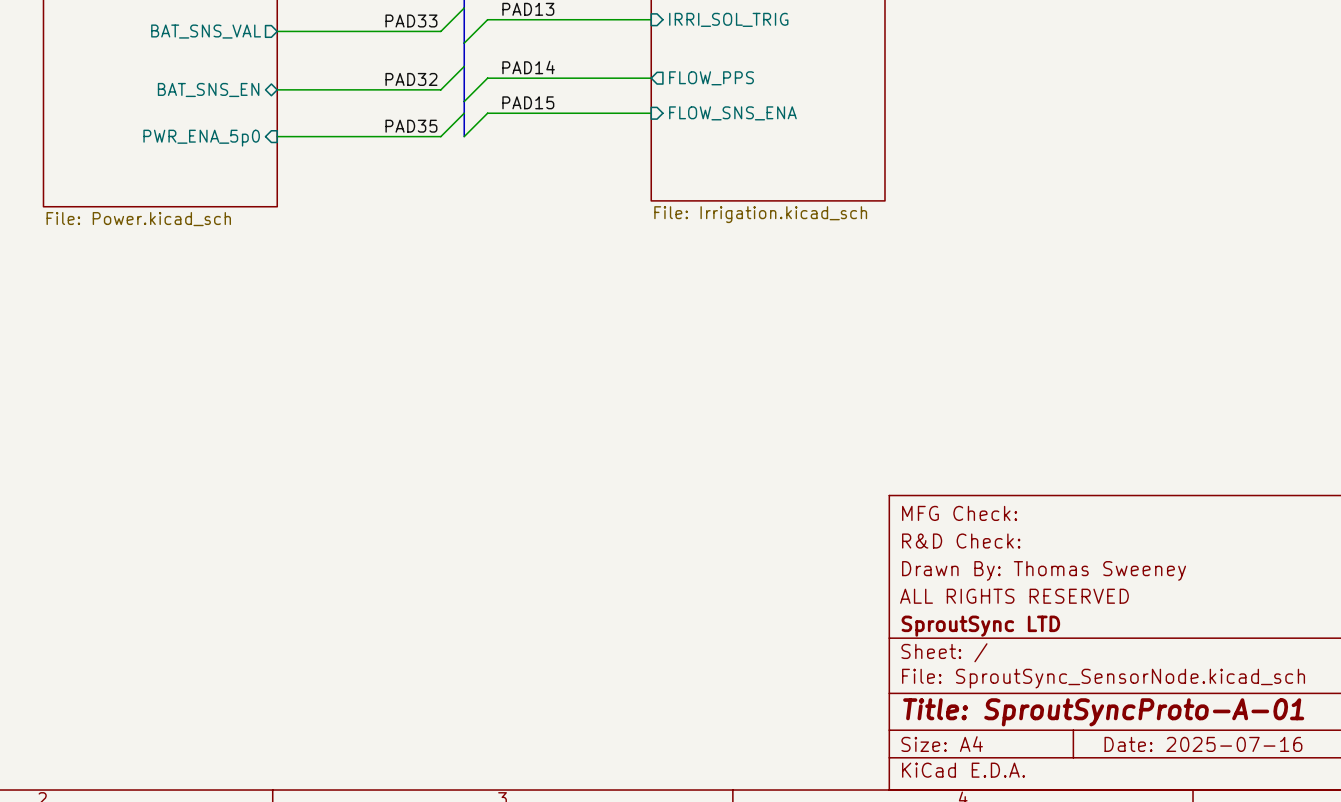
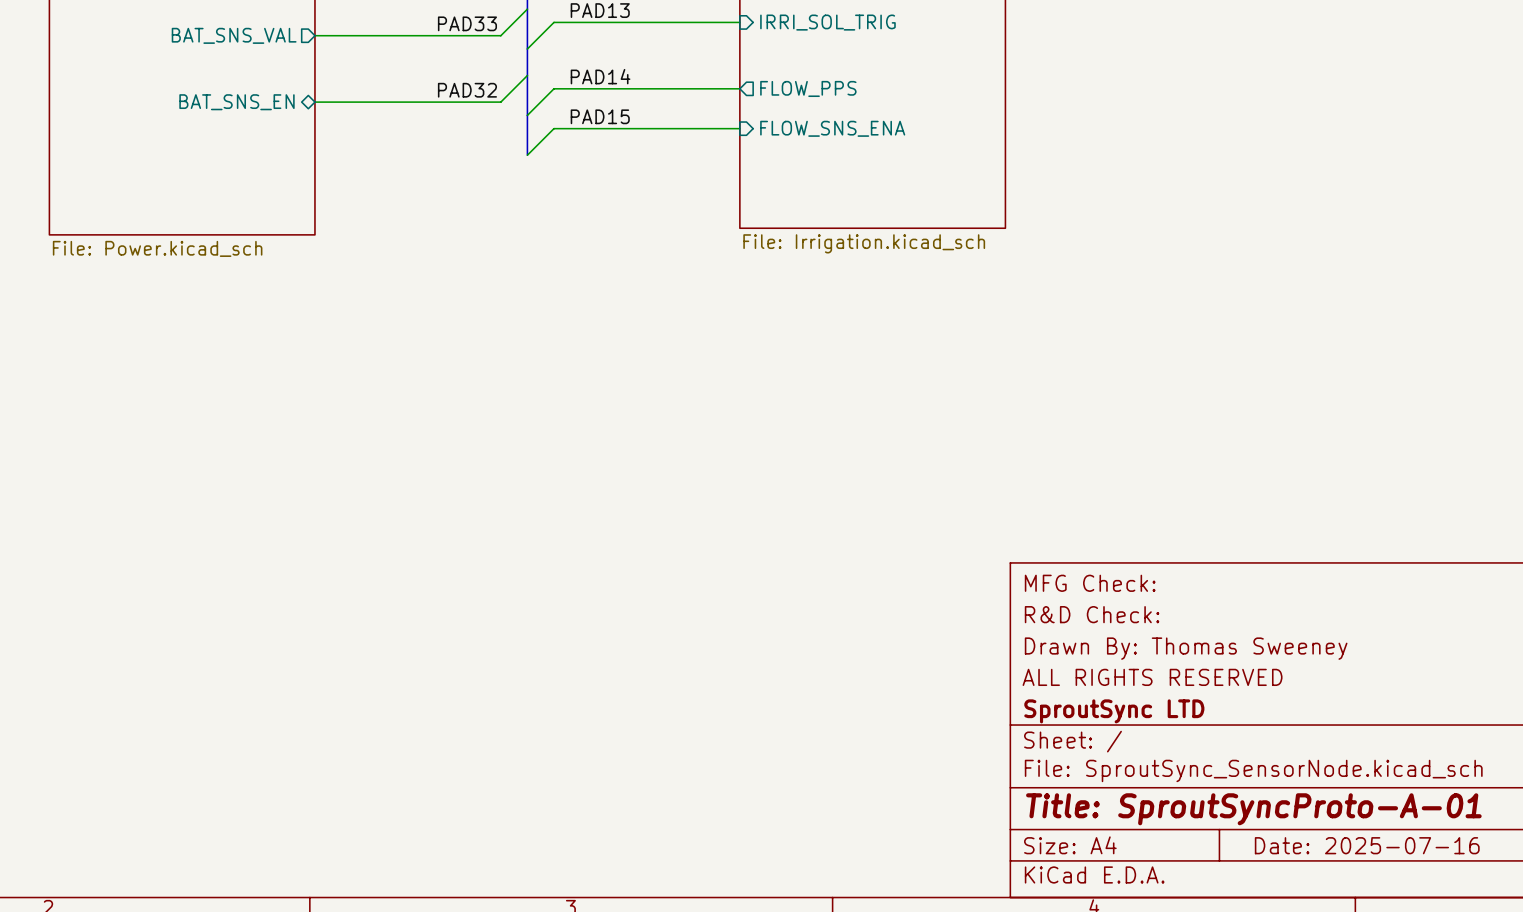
wire: (464, 113) (440, 136) (277, 136) -> none
label: PAD35 (411, 126) -> none
sheet pin: PWR_ENA_5p0 (201, 138) -> none

